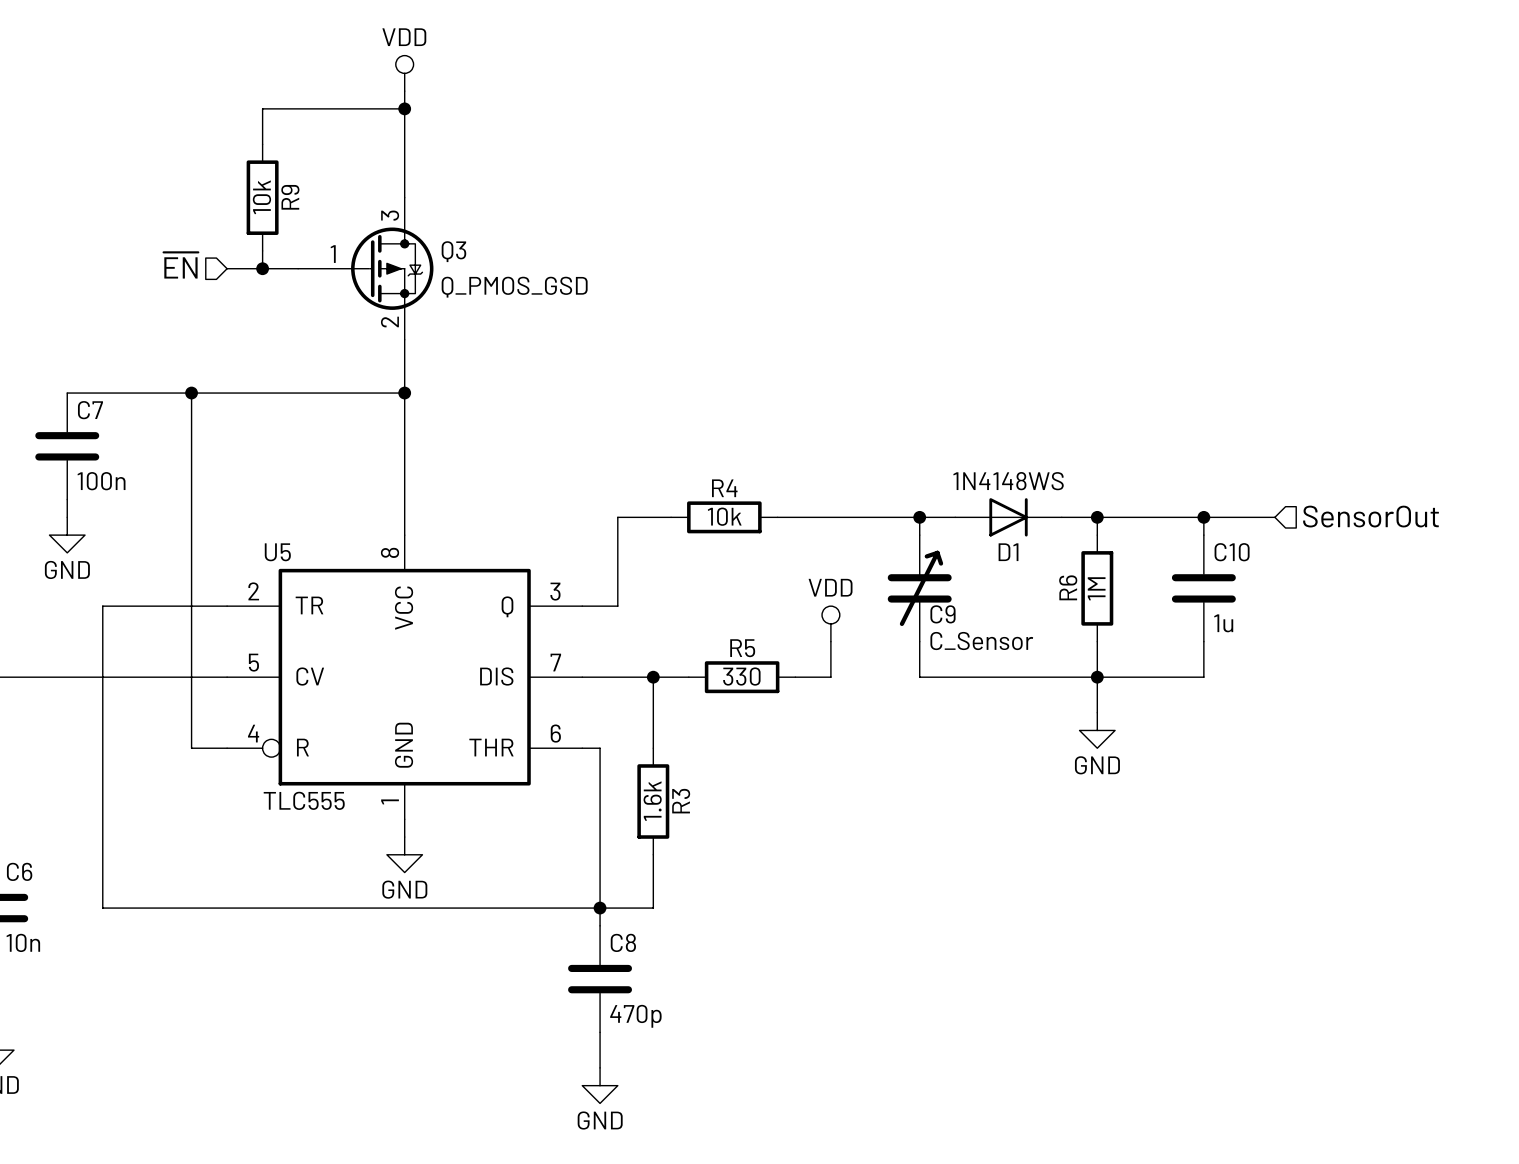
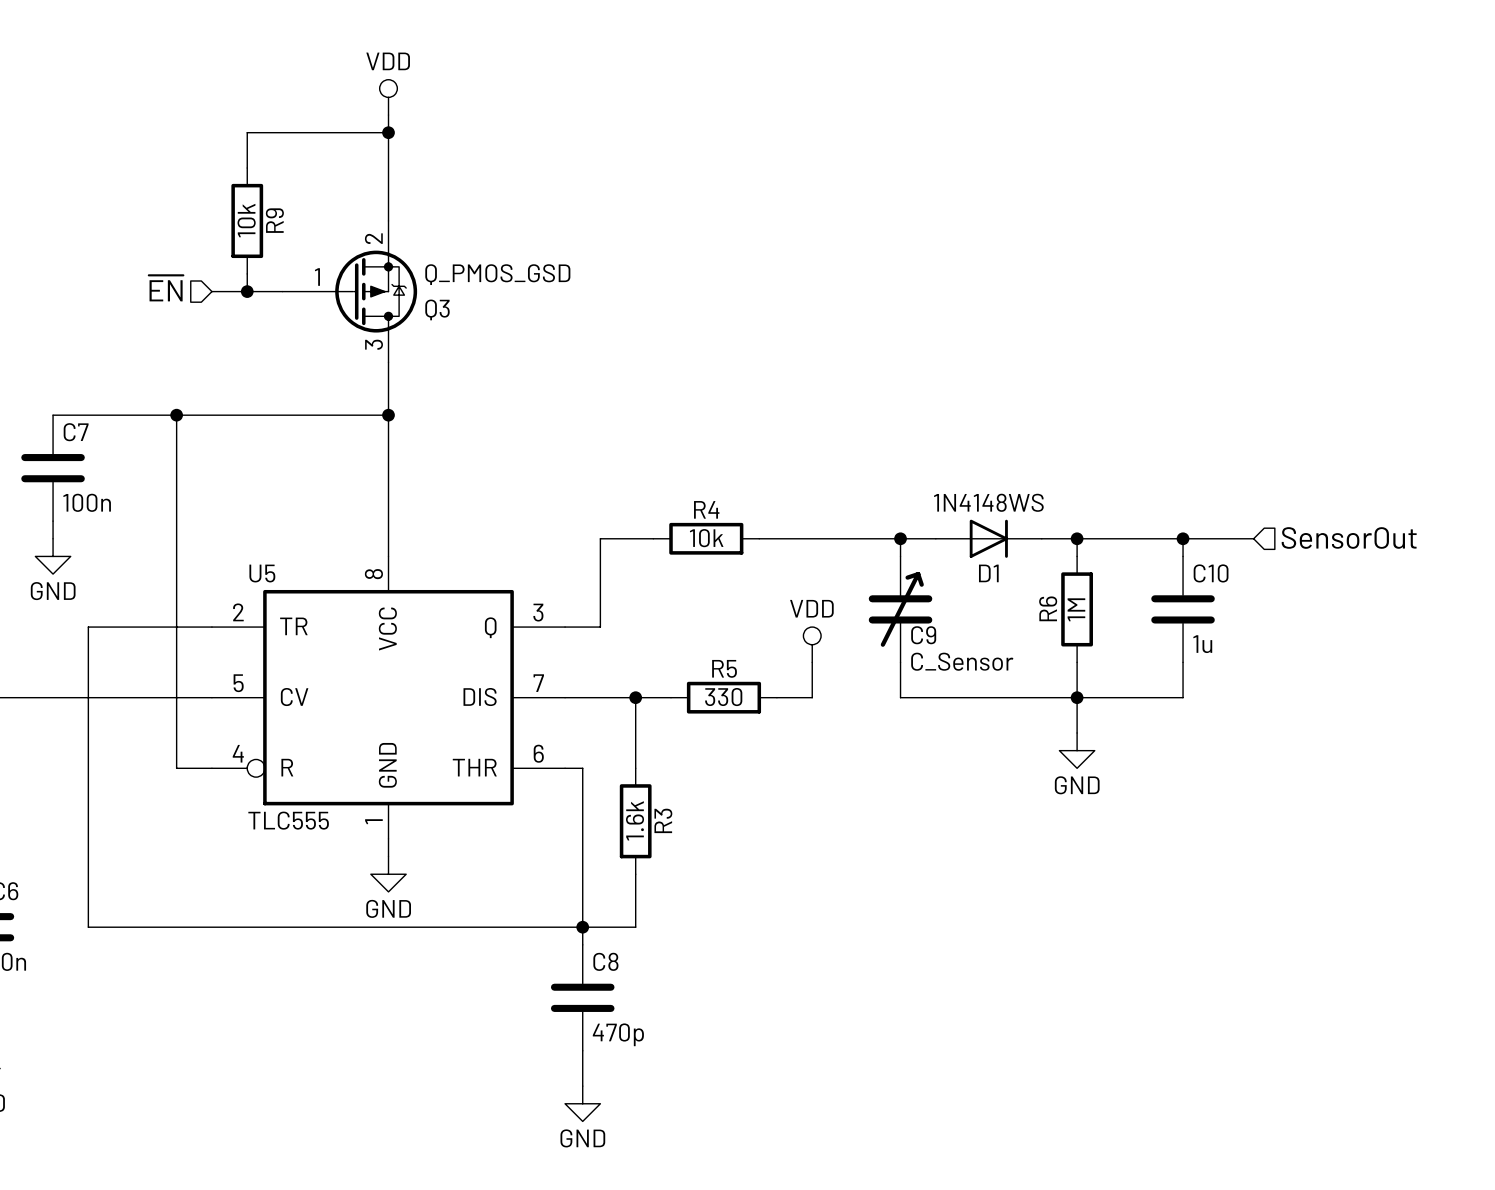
Q3 flip: as is (392, 268) -> up-down (376, 291)

